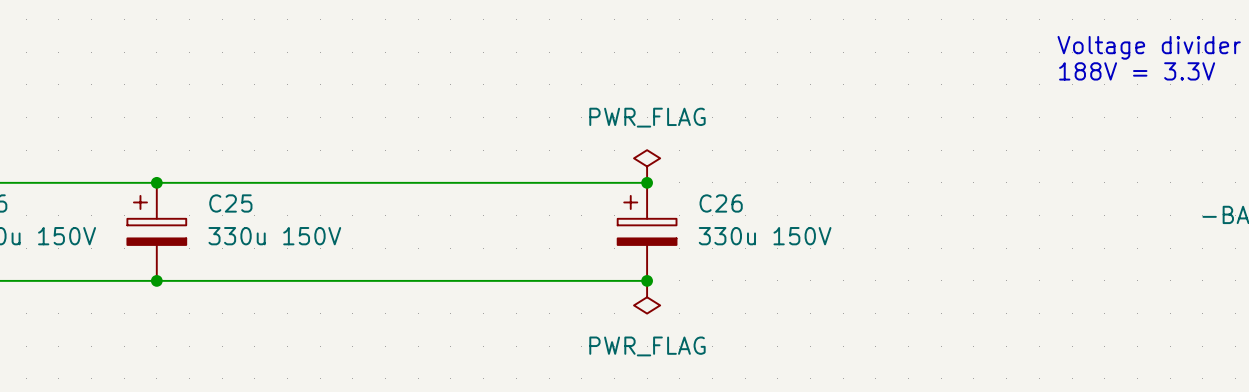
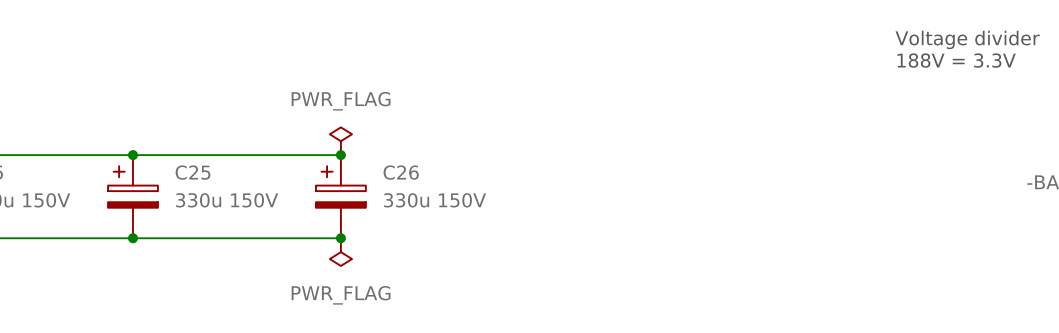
power symbol: none -> PWR_FLAG (340, 141)
power symbol: PWR_FLAG (647, 166) -> none
wire: (401, 182) (647, 182) -> none
junction: none -> (340, 155)
junction: (647, 182) -> none
C26 position: (647, 231) -> (340, 196)
wire: (401, 280) (647, 280) -> none
junction: none -> (340, 238)
junction: (647, 280) -> none
power symbol: none -> PWR_FLAG (340, 252)
power symbol: PWR_FLAG (647, 297) -> none

